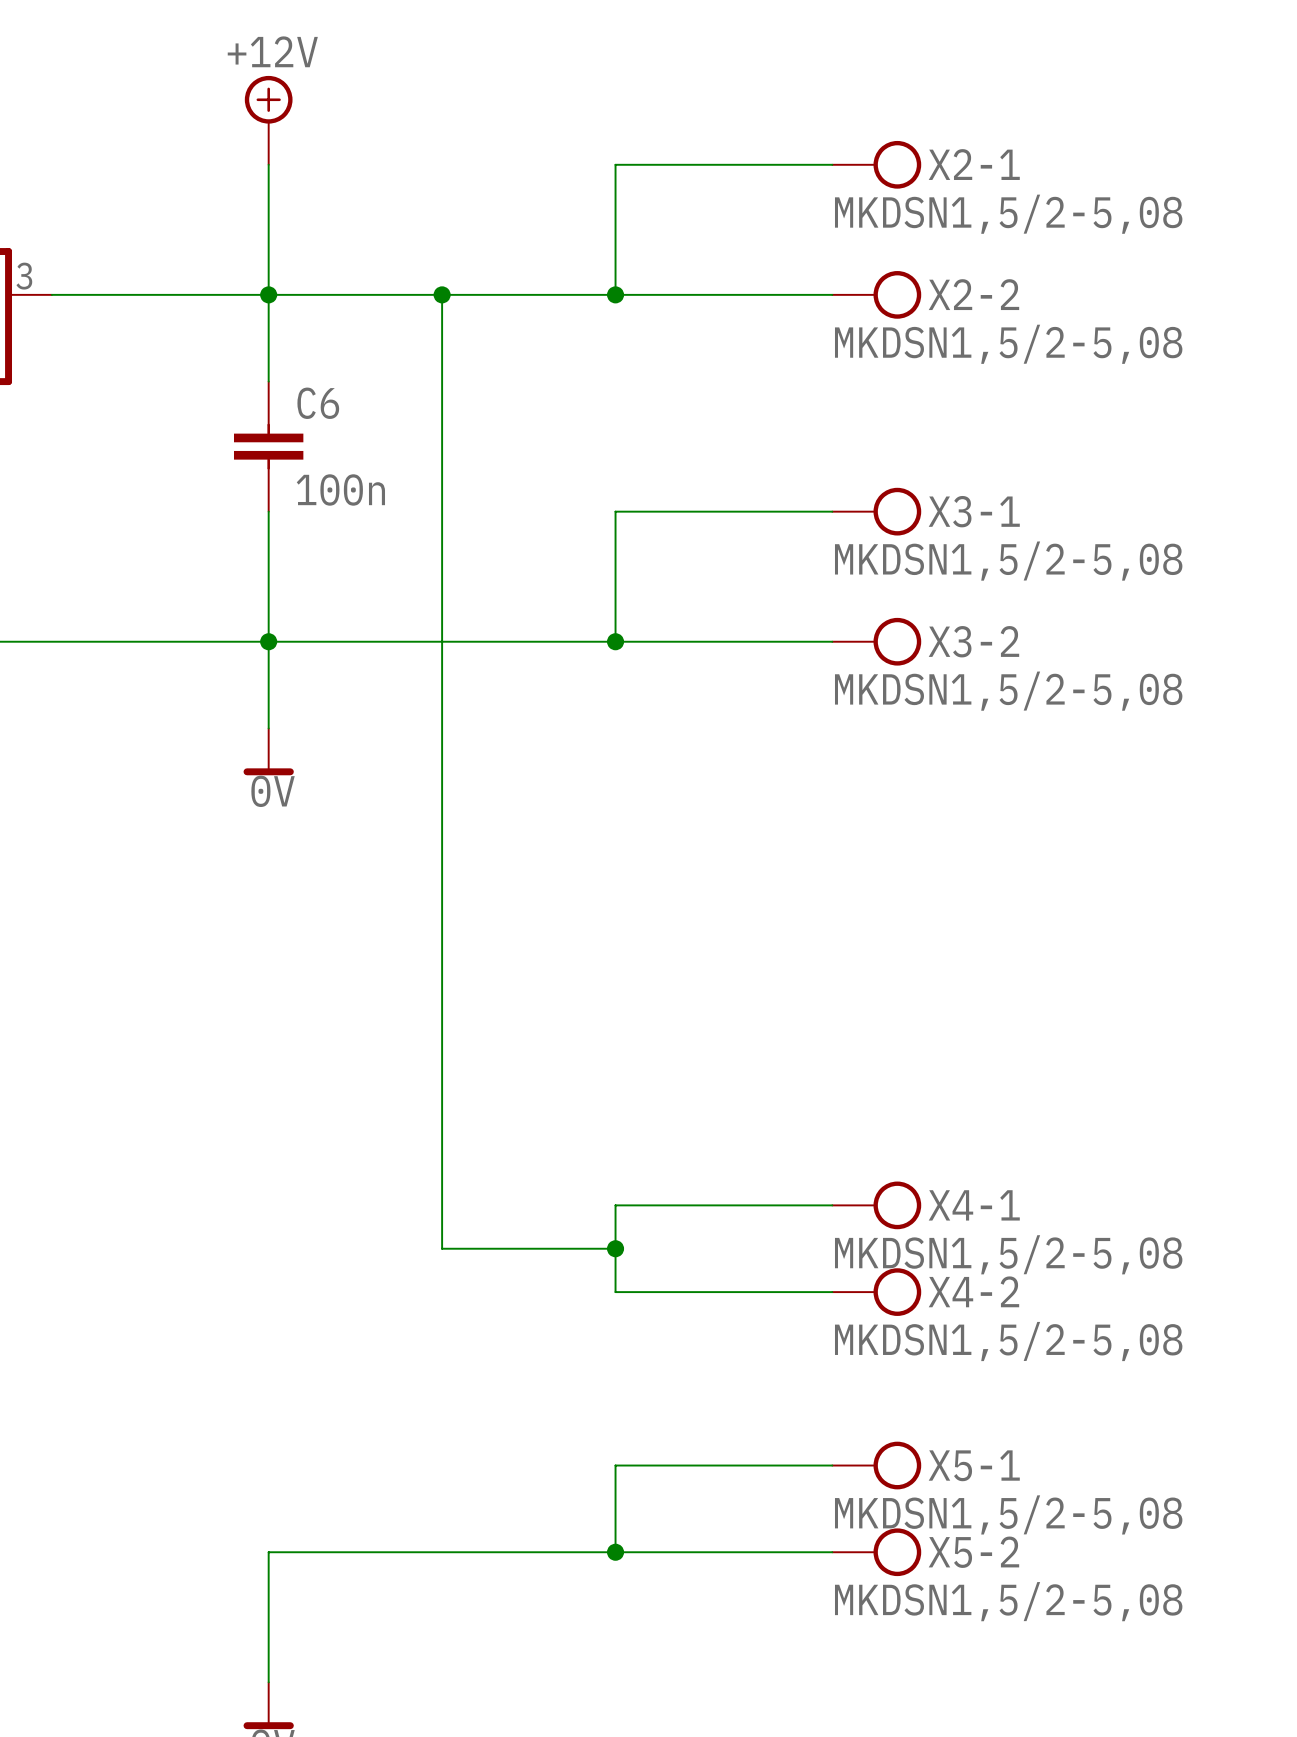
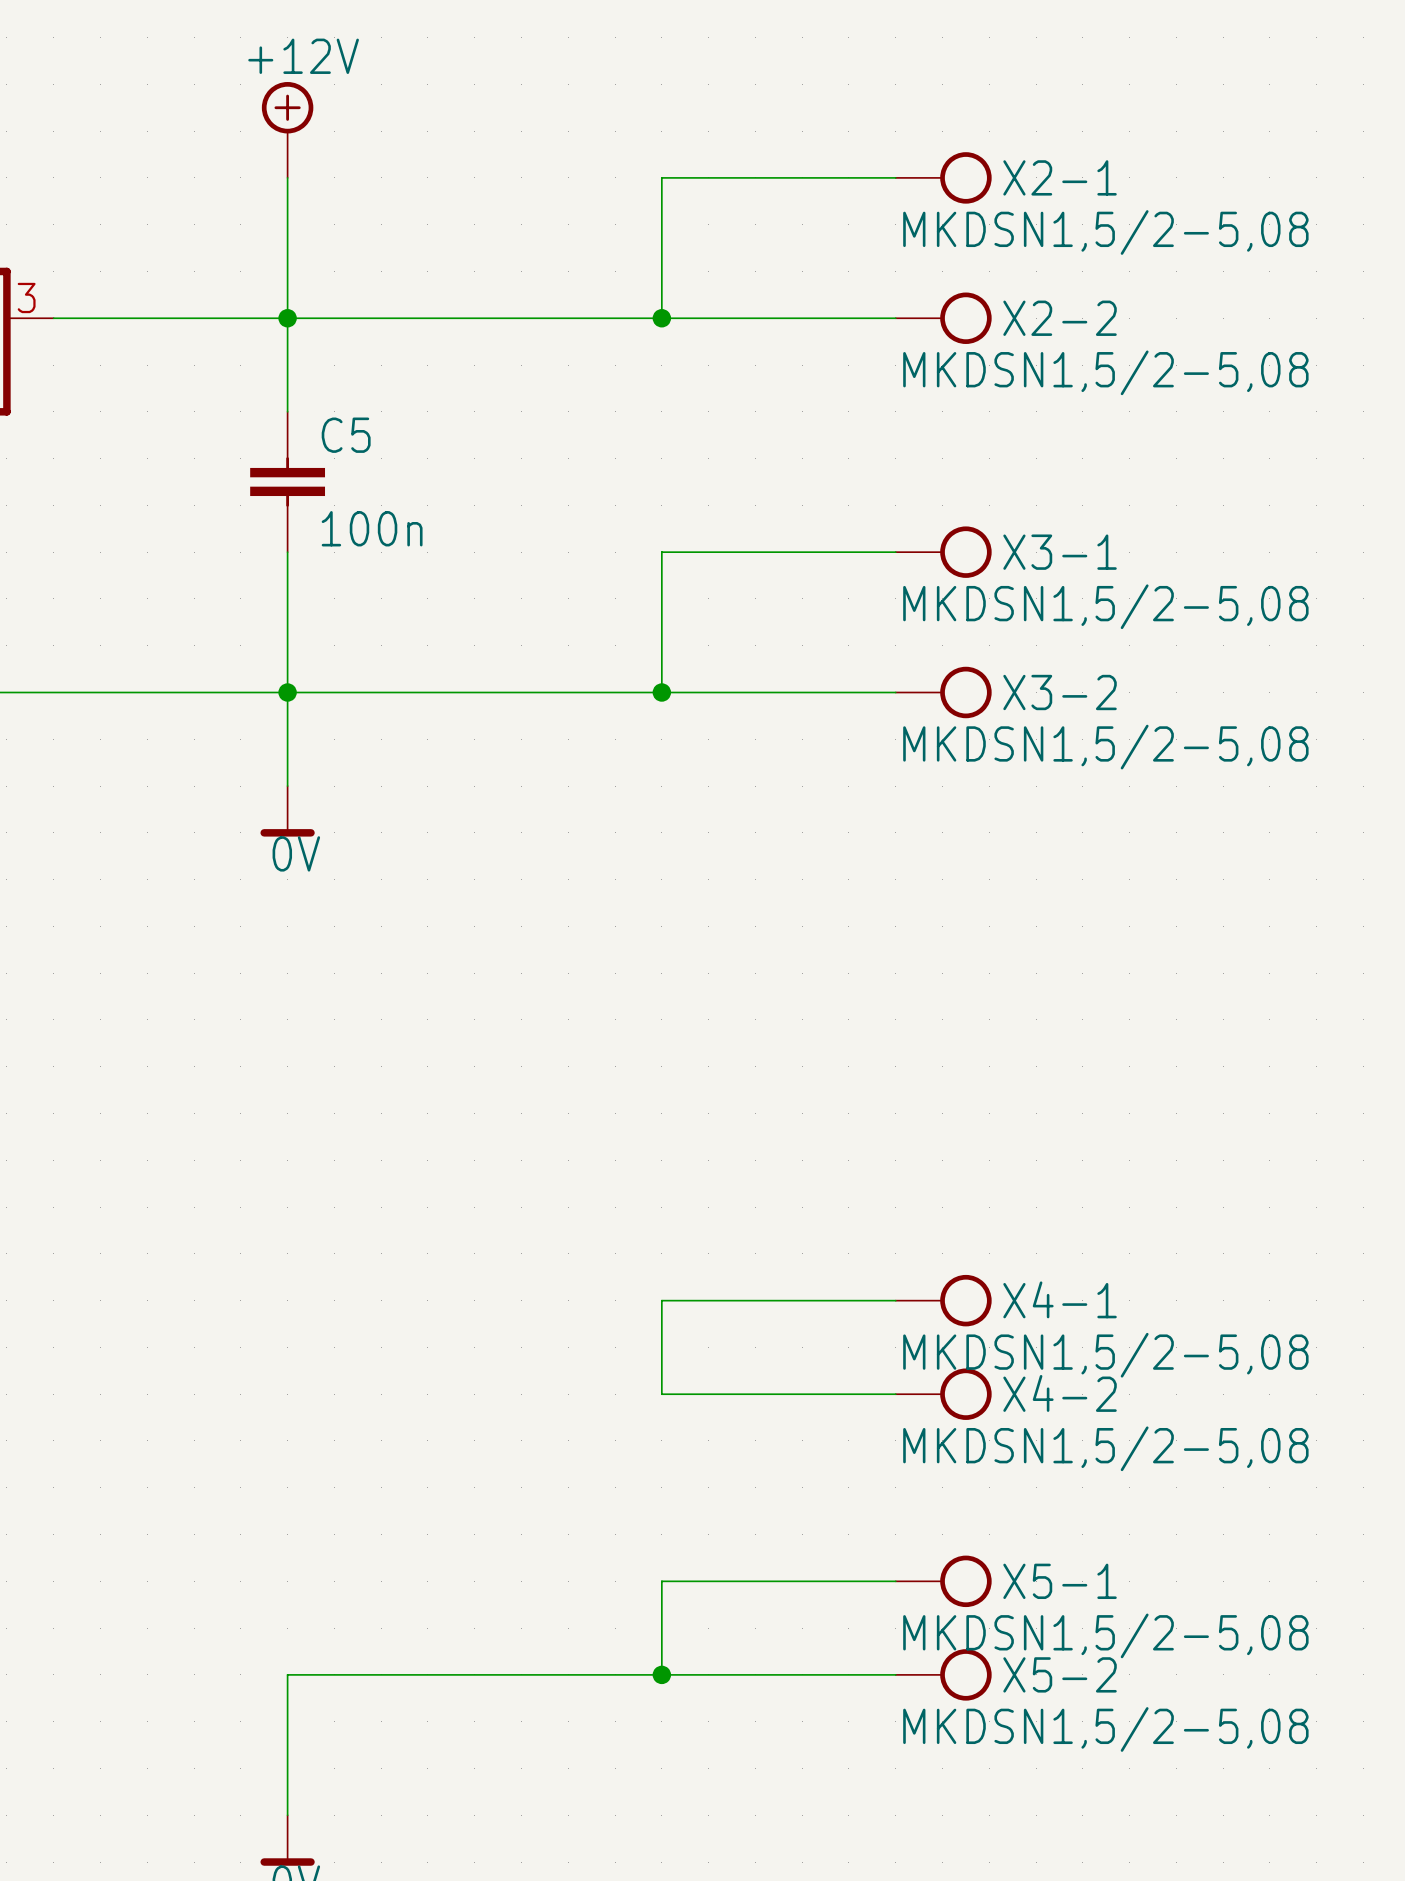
wire: (442, 294) (442, 1248) (615, 1248) -> none
junction: (442, 294) -> none
C6 name: C6 (318, 403) -> C5 (346, 435)
junction: (615, 1248) -> none

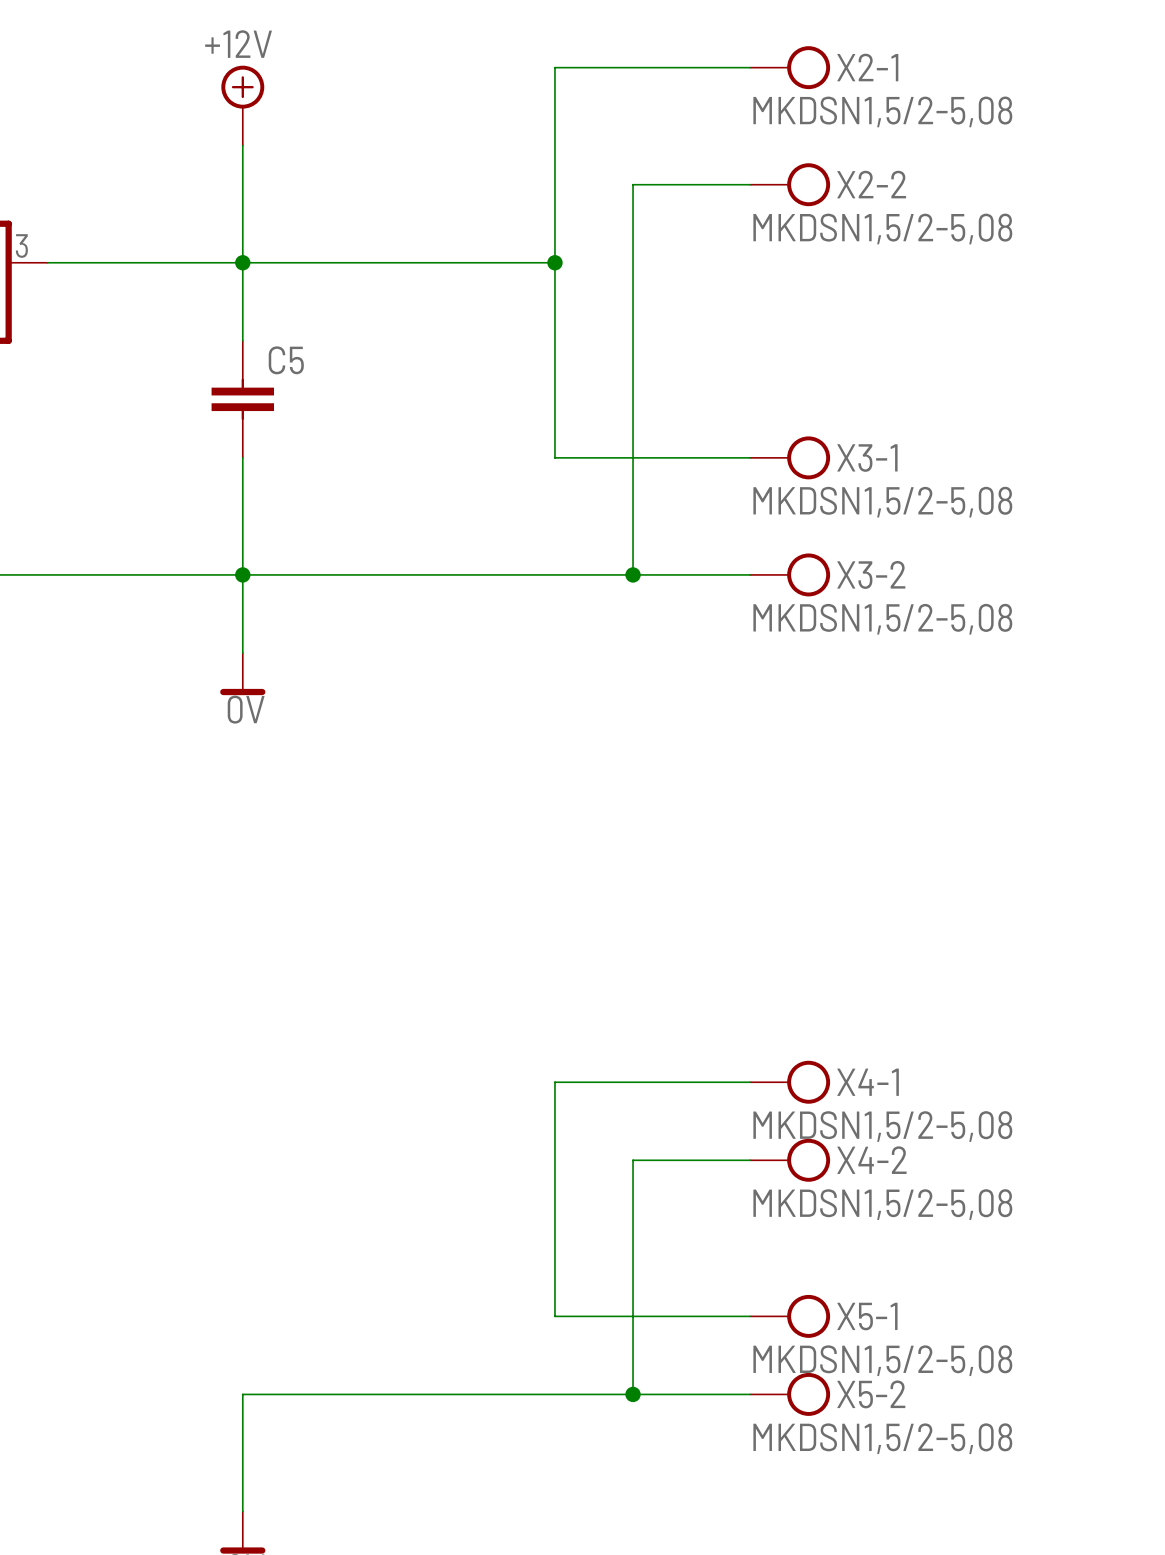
wire: (661, 177) (895, 177) -> (554, 145) (554, 67) (750, 67)
X2-1 position: (943, 177) -> (790, 67)
wire: none -> (750, 184) (633, 184) (633, 574)
wire: (661, 318) (895, 318) -> (554, 262) (554, 457)
X2-2 position: (943, 318) -> (790, 184)
C5 value: 100n (372, 528) -> none
wire: (661, 552) (661, 692) -> none
junction position: (661, 692) -> (633, 574)
wire: (661, 1394) (755, 1394) -> (554, 1160) (554, 1316)
wire: none -> (633, 1160) (633, 1394)
wire: (661, 1581) (661, 1674) -> none
junction position: (661, 1674) -> (633, 1394)

